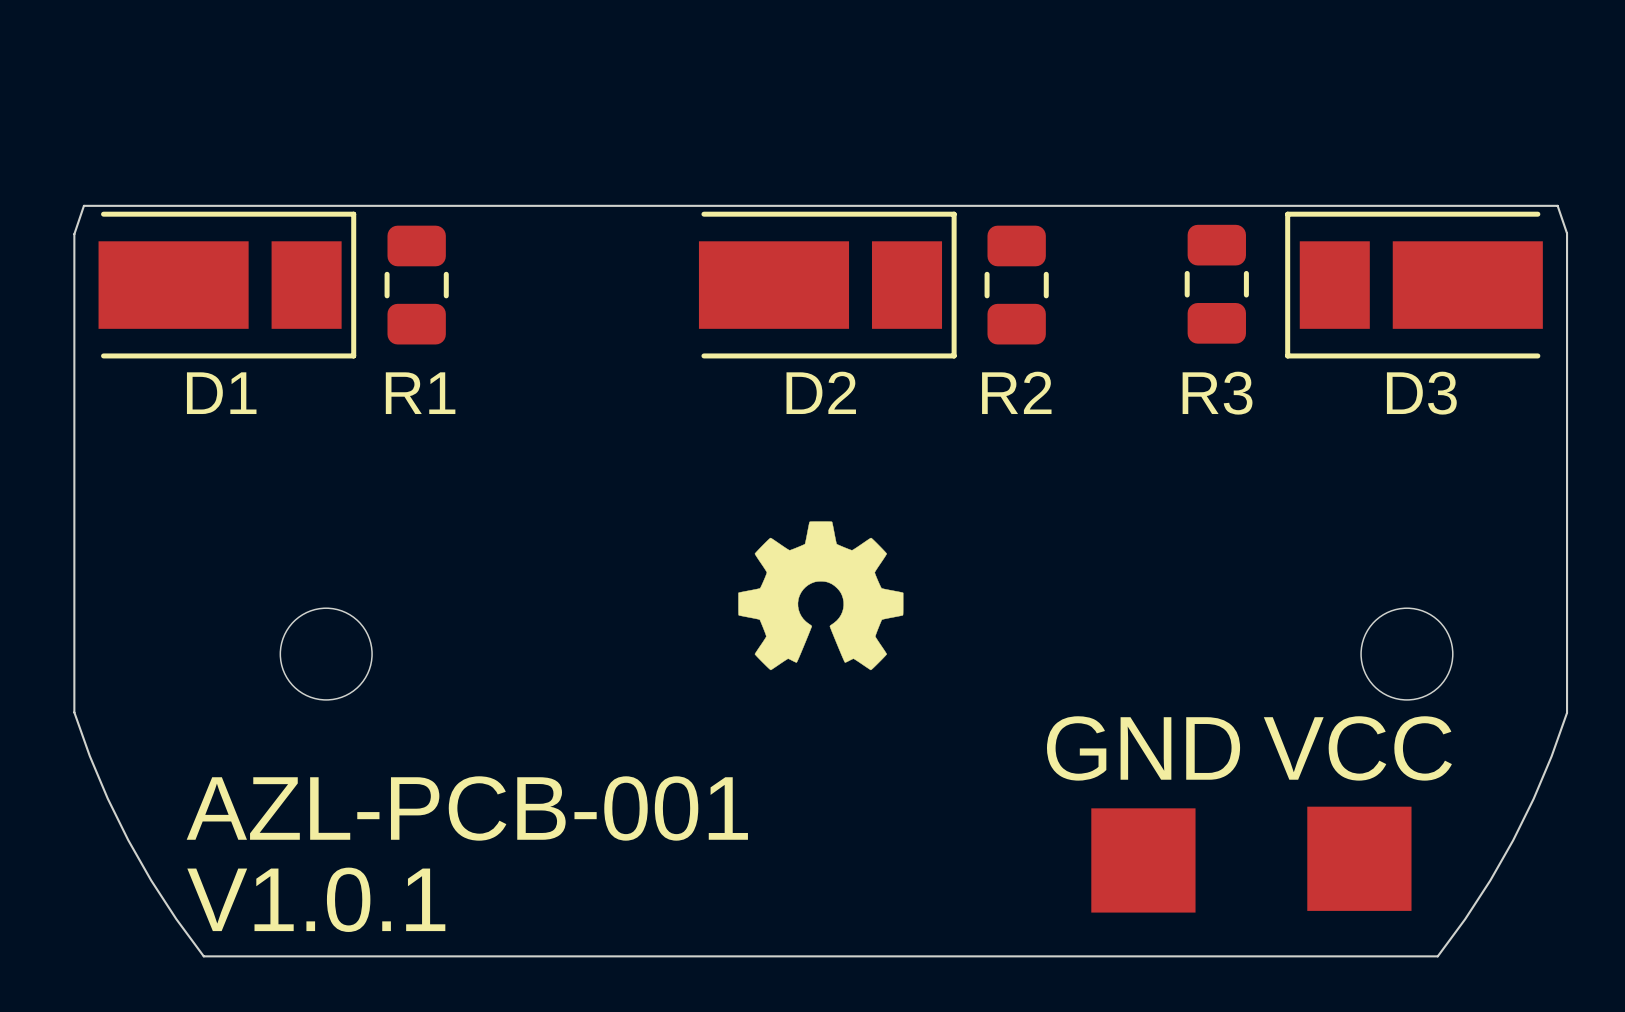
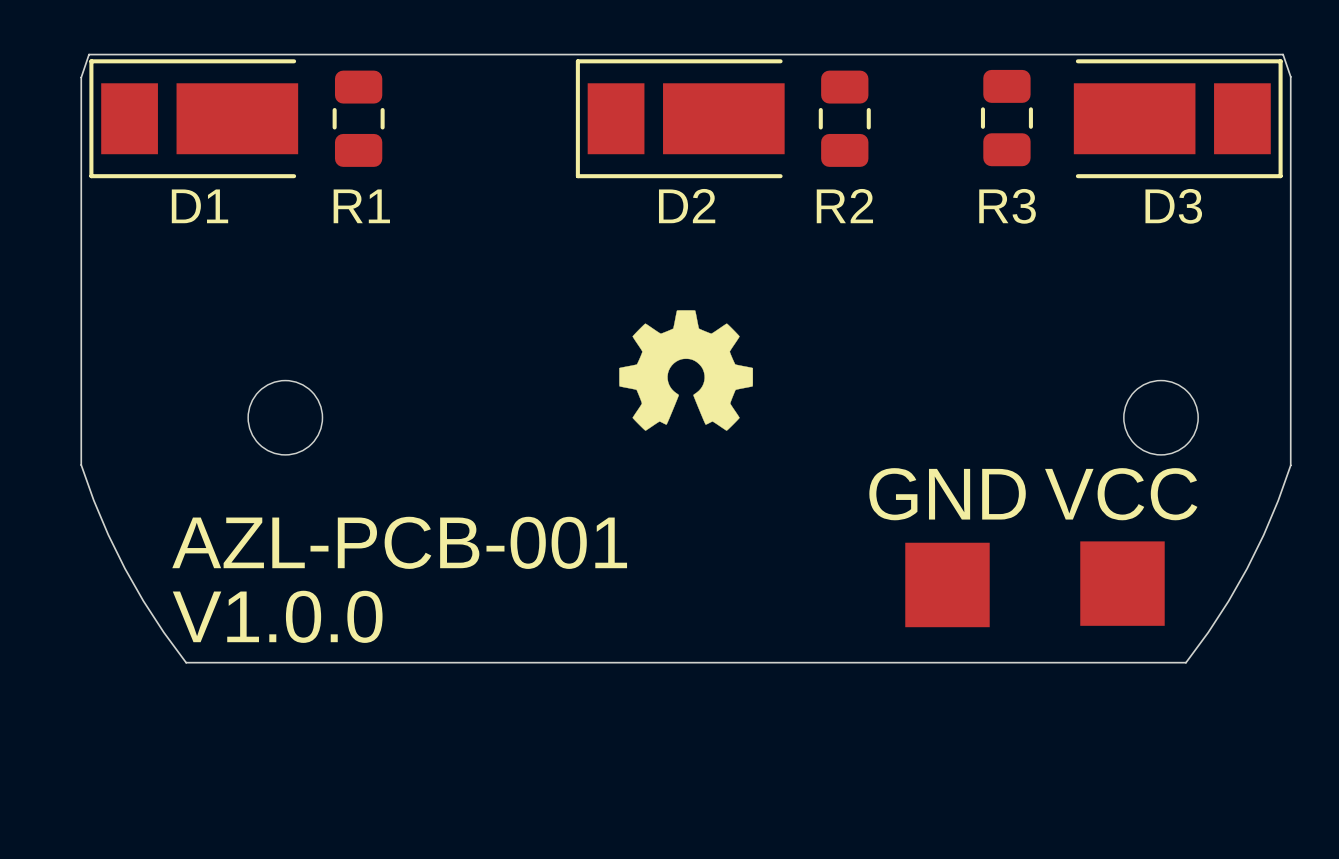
D1 rotation: 0° (227, 285) -> 180° (193, 118)
D2 rotation: 0° (827, 285) -> 180° (680, 118)
D3 rotation: 0° (1414, 285) -> 180° (1178, 118)
text: V1.0.1 (316, 899) -> V1.0.0 (277, 616)

